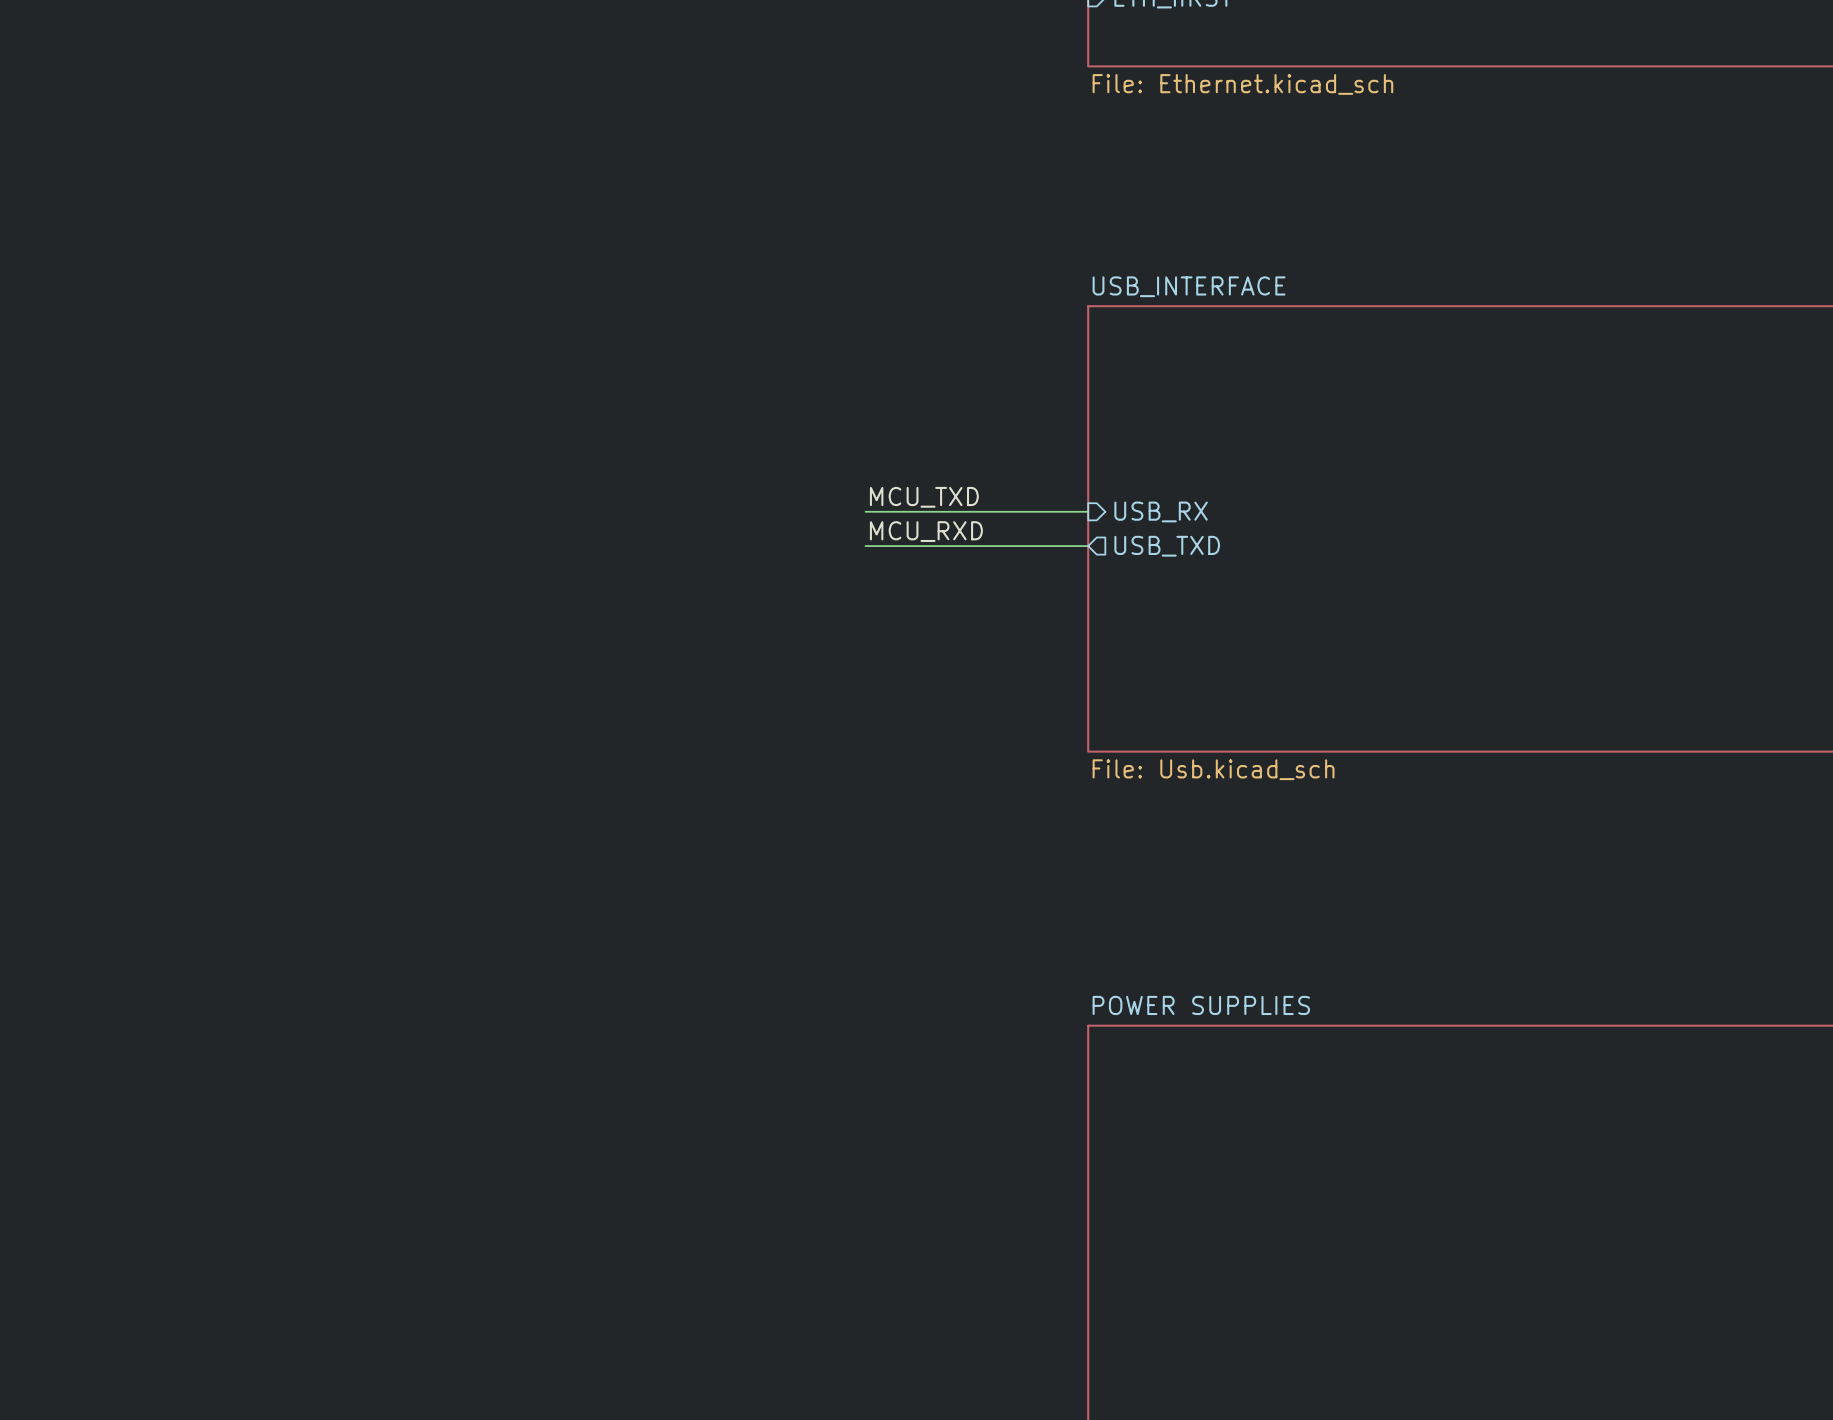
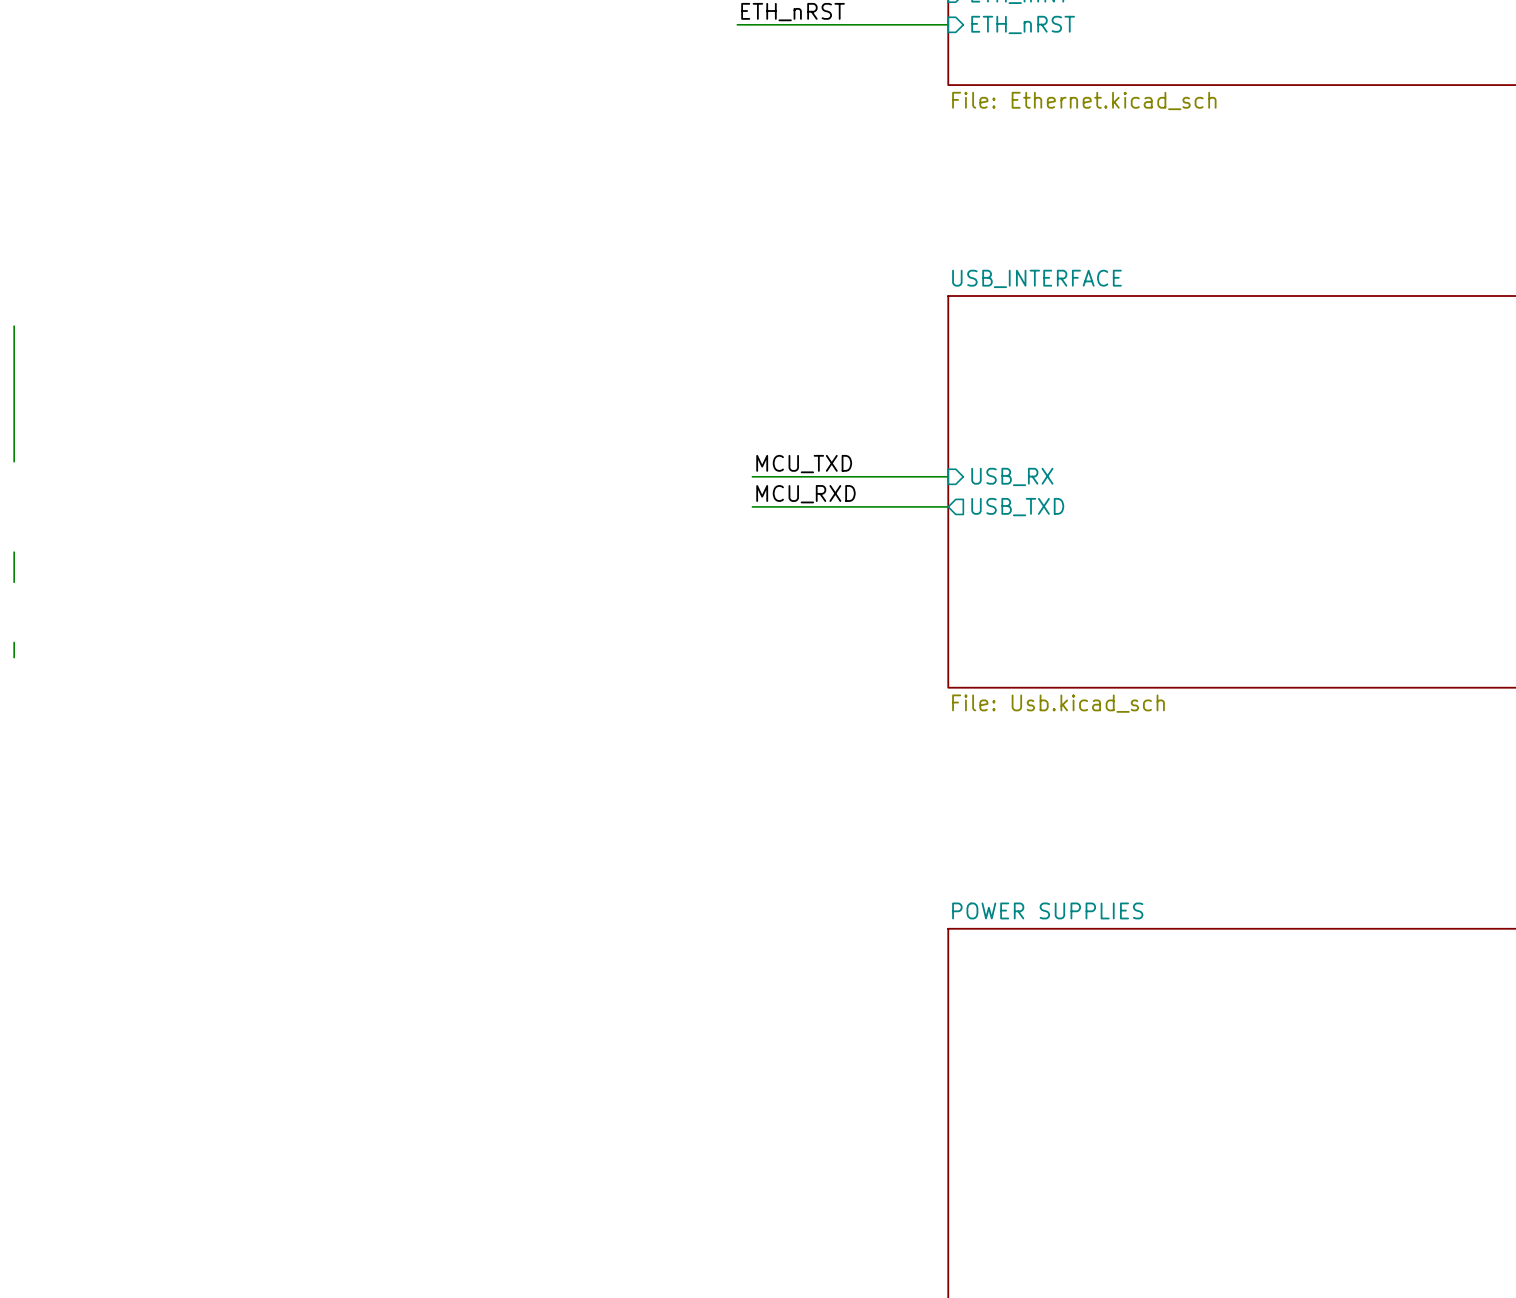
wire: none -> (14, 326) (14, 461)
wire: none -> (14, 552) (14, 582)
wire: none -> (14, 642) (14, 657)

